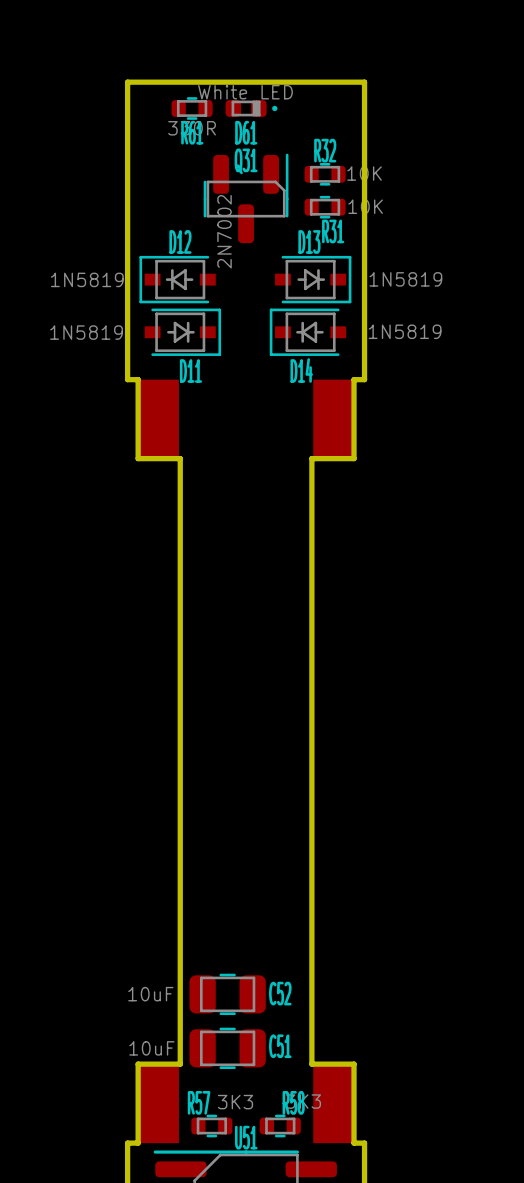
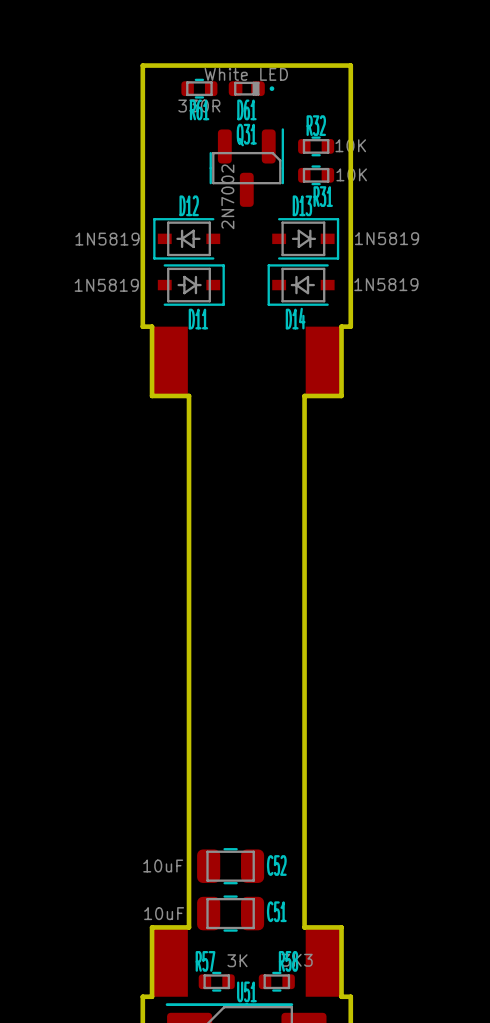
R57 value: 3K3 (235, 1102) -> 3K (237, 960)

